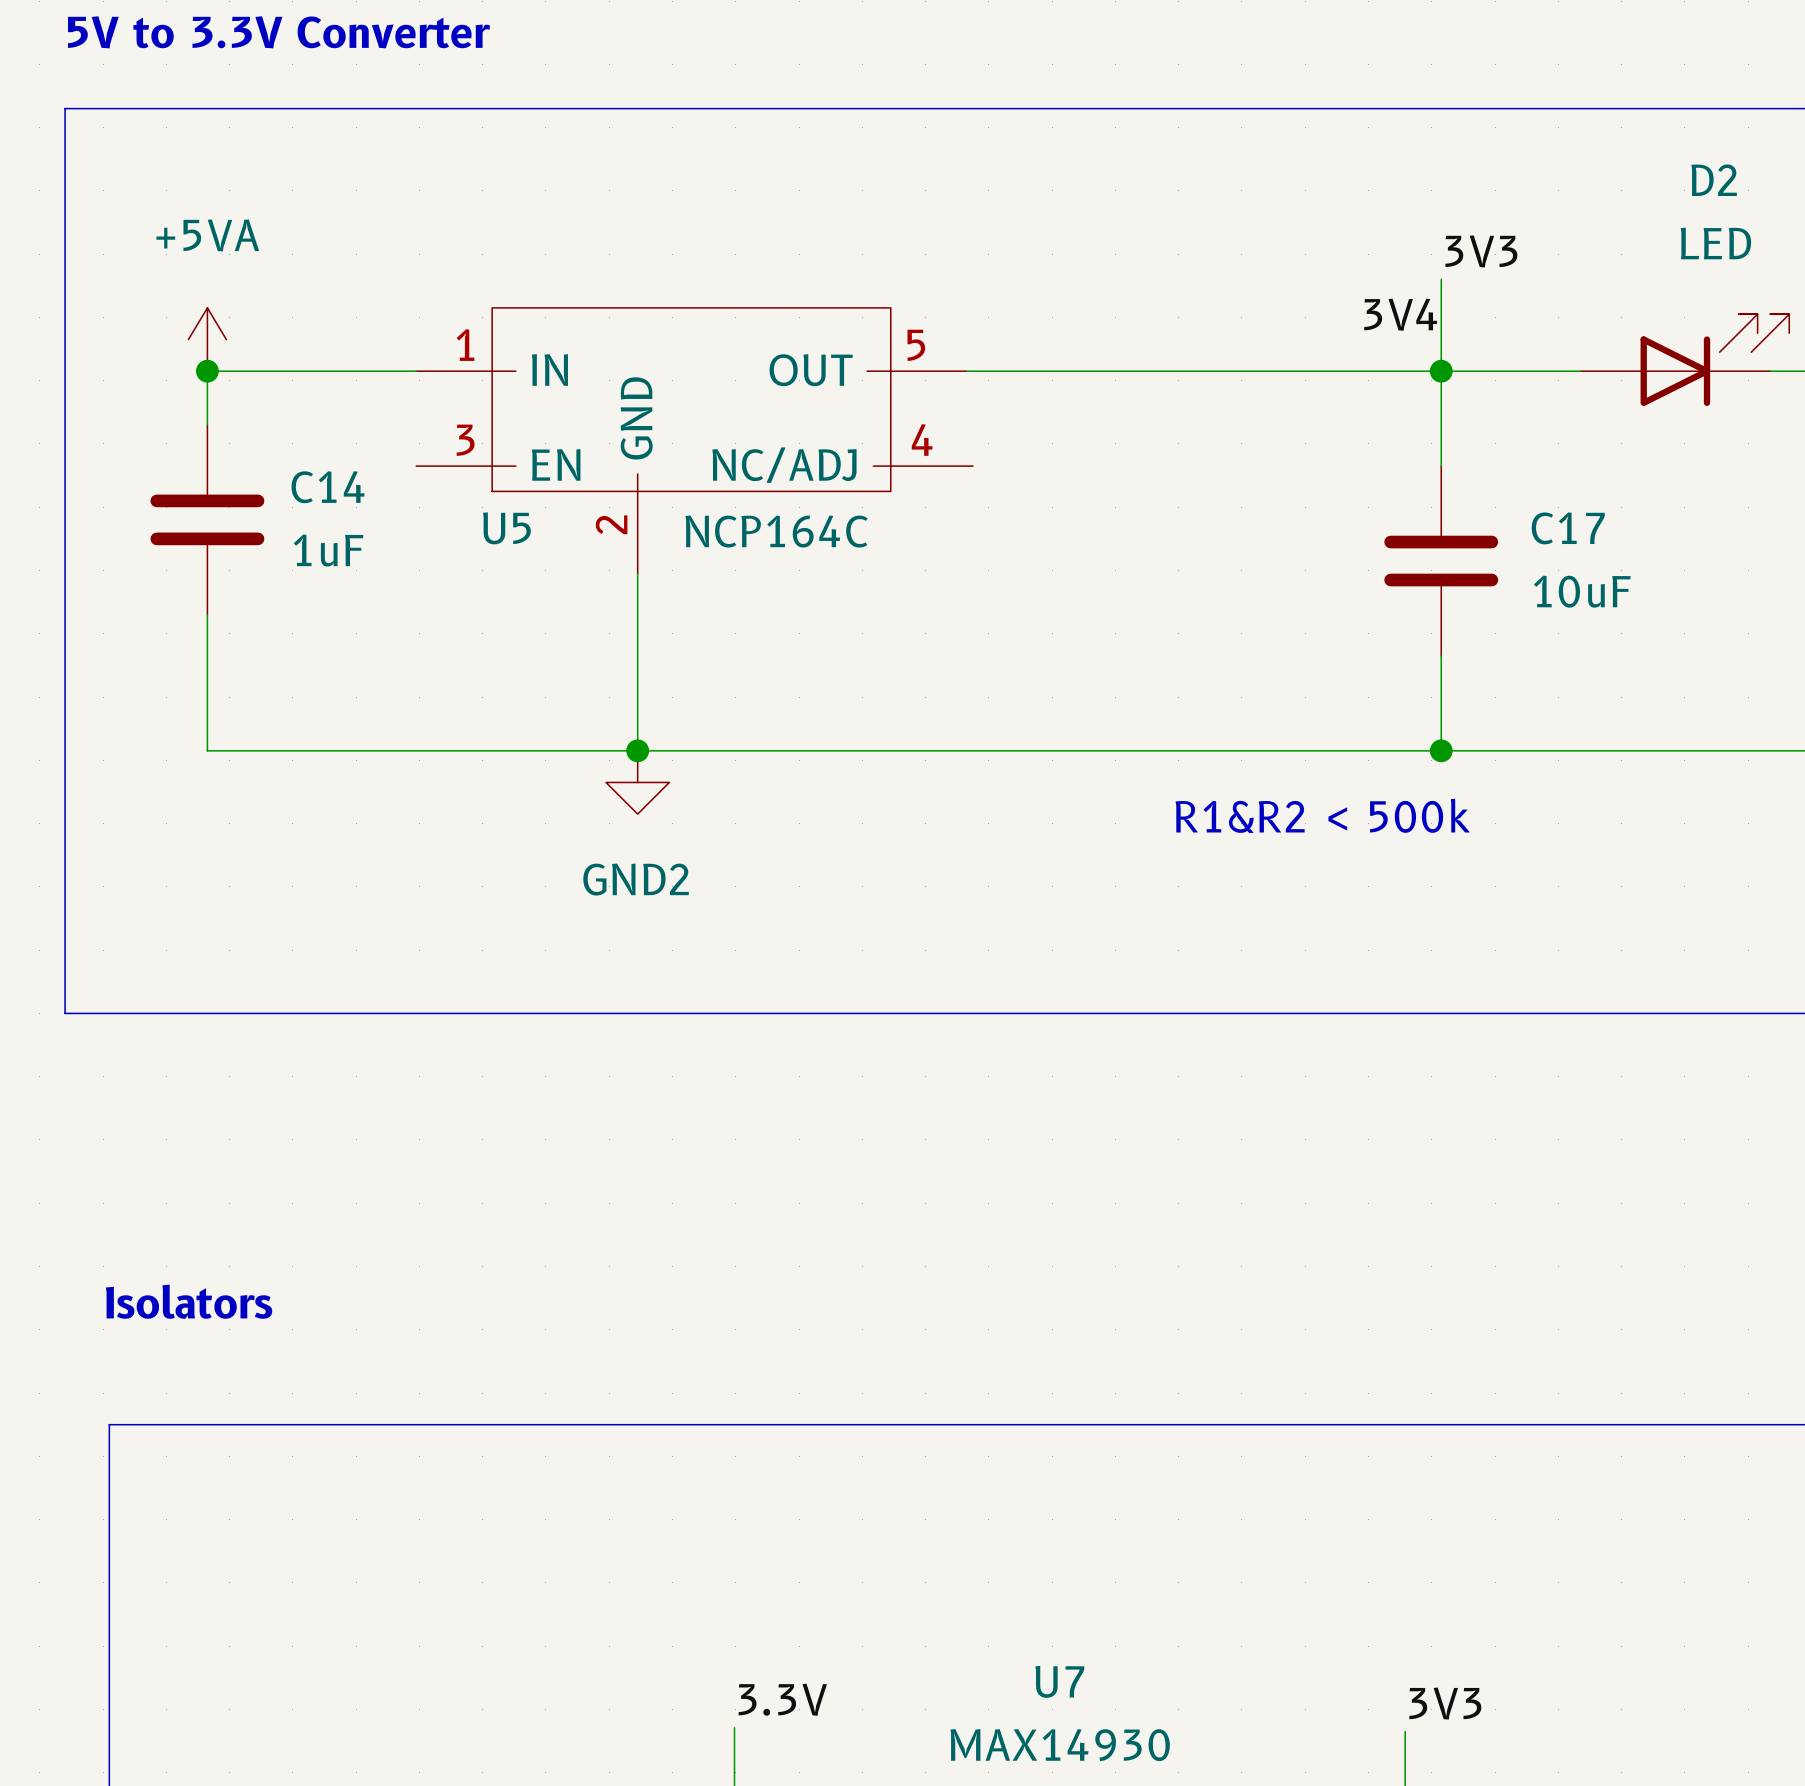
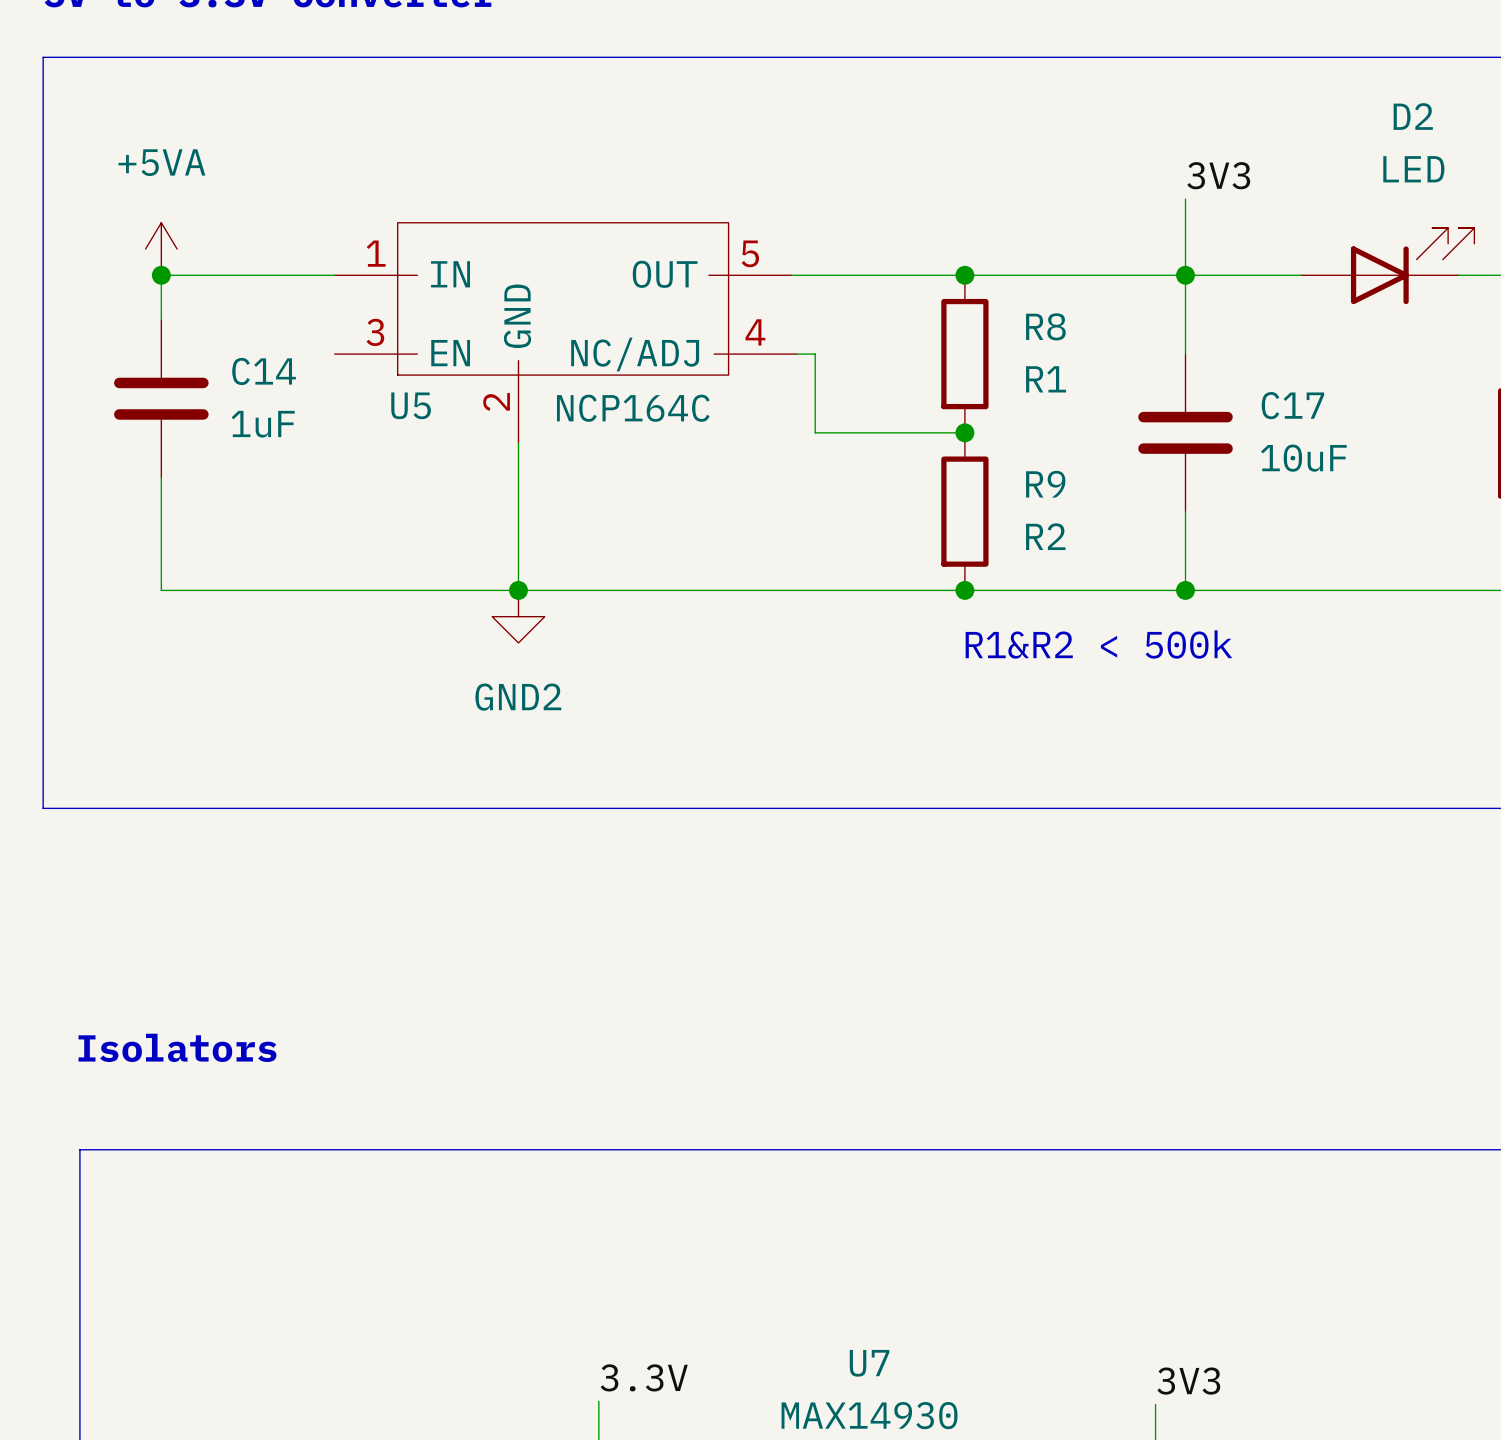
label: 3V4 (1400, 314) -> none
junction: none -> (964, 275)
wire: none -> (796, 354) (815, 354) (815, 432) (964, 432)
R8: none -> R1 (964, 354)
junction: none -> (964, 432)
R9: none -> R2 (964, 511)
junction: none -> (964, 590)

